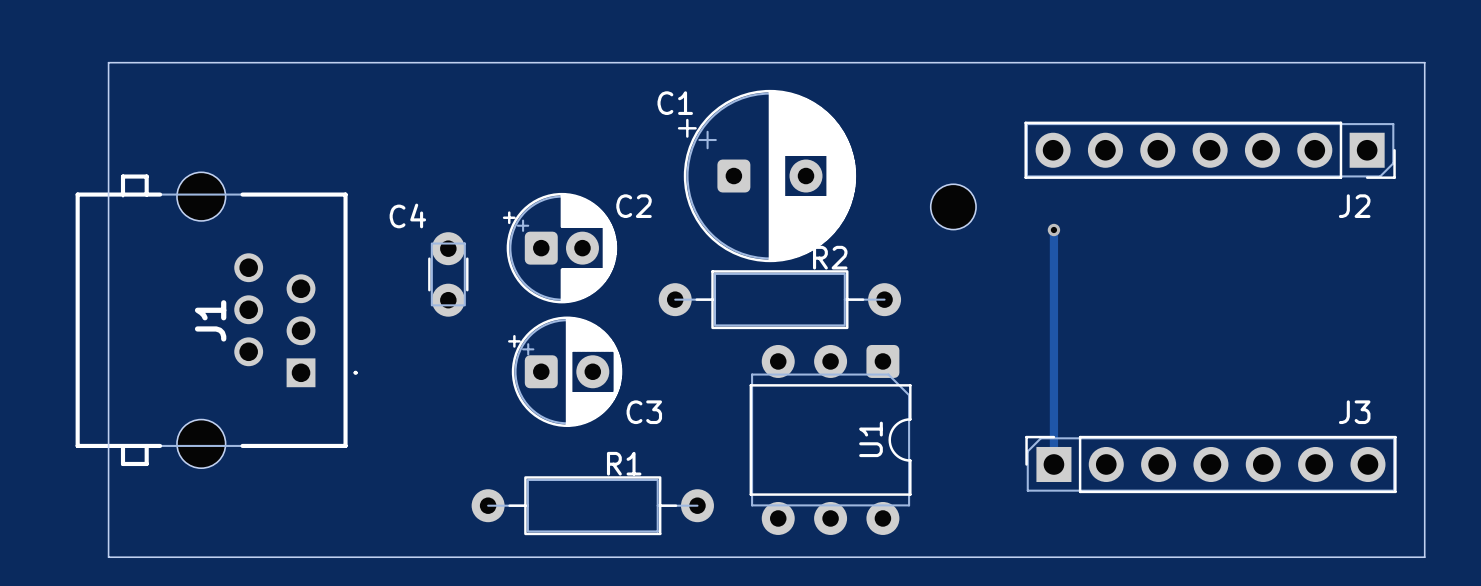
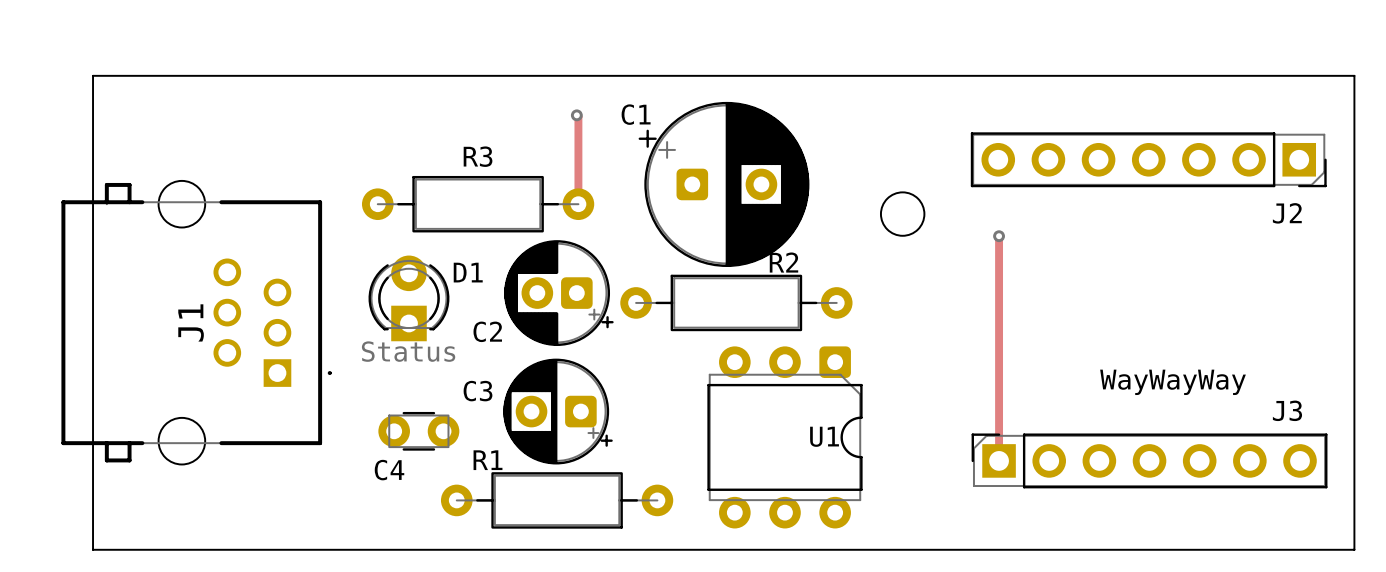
track: none -> (576, 115) (578, 116) (578, 204)
via: none -> (576, 115)
R3: none -> (478, 204)
C4 name position: C4 (407, 215) -> C4 (389, 470)
C2 rotation: 0° (559, 248) -> 180° (558, 293)
C4 rotation: 0° (448, 274) -> 90° clockwise (418, 431)
C4 position: (448, 274) -> (418, 431)
D1: none -> Status (408, 298)
C3 rotation: 0° (565, 371) -> 180° (558, 411)
text: none -> WayWayWay (1173, 382)
U1 name rotation: 0° (871, 439) -> 90° clockwise (824, 436)
R1 name position: R1 (624, 463) -> R1 (488, 460)

